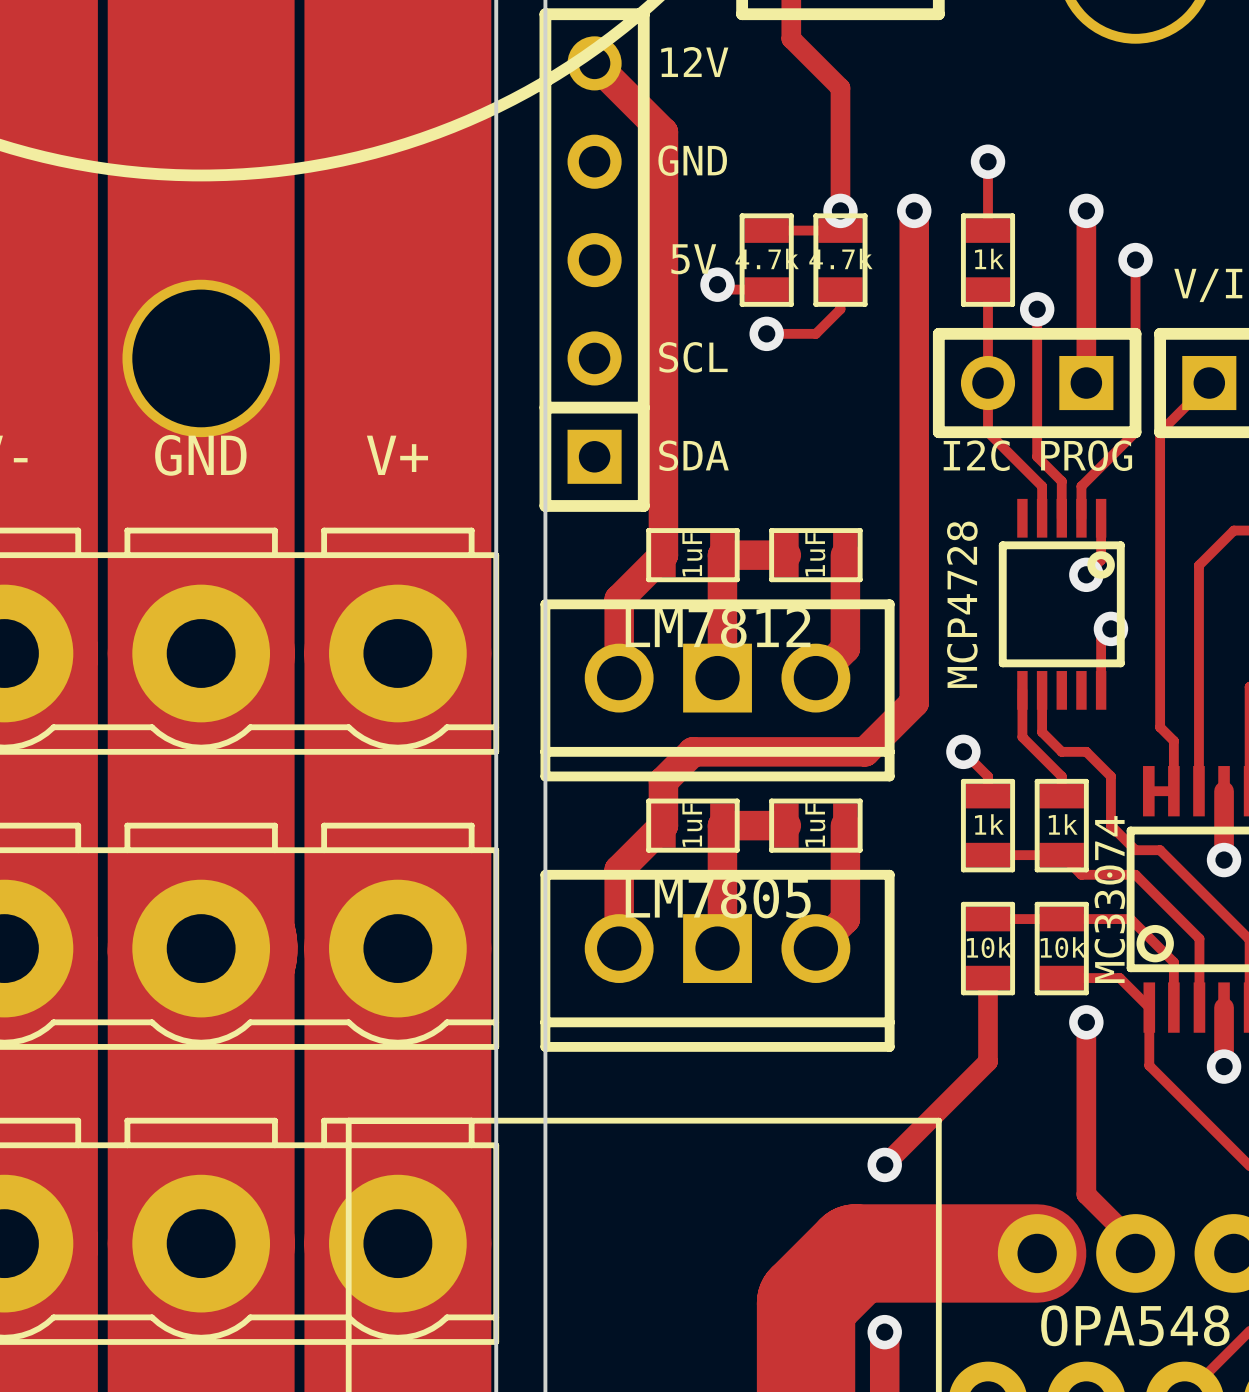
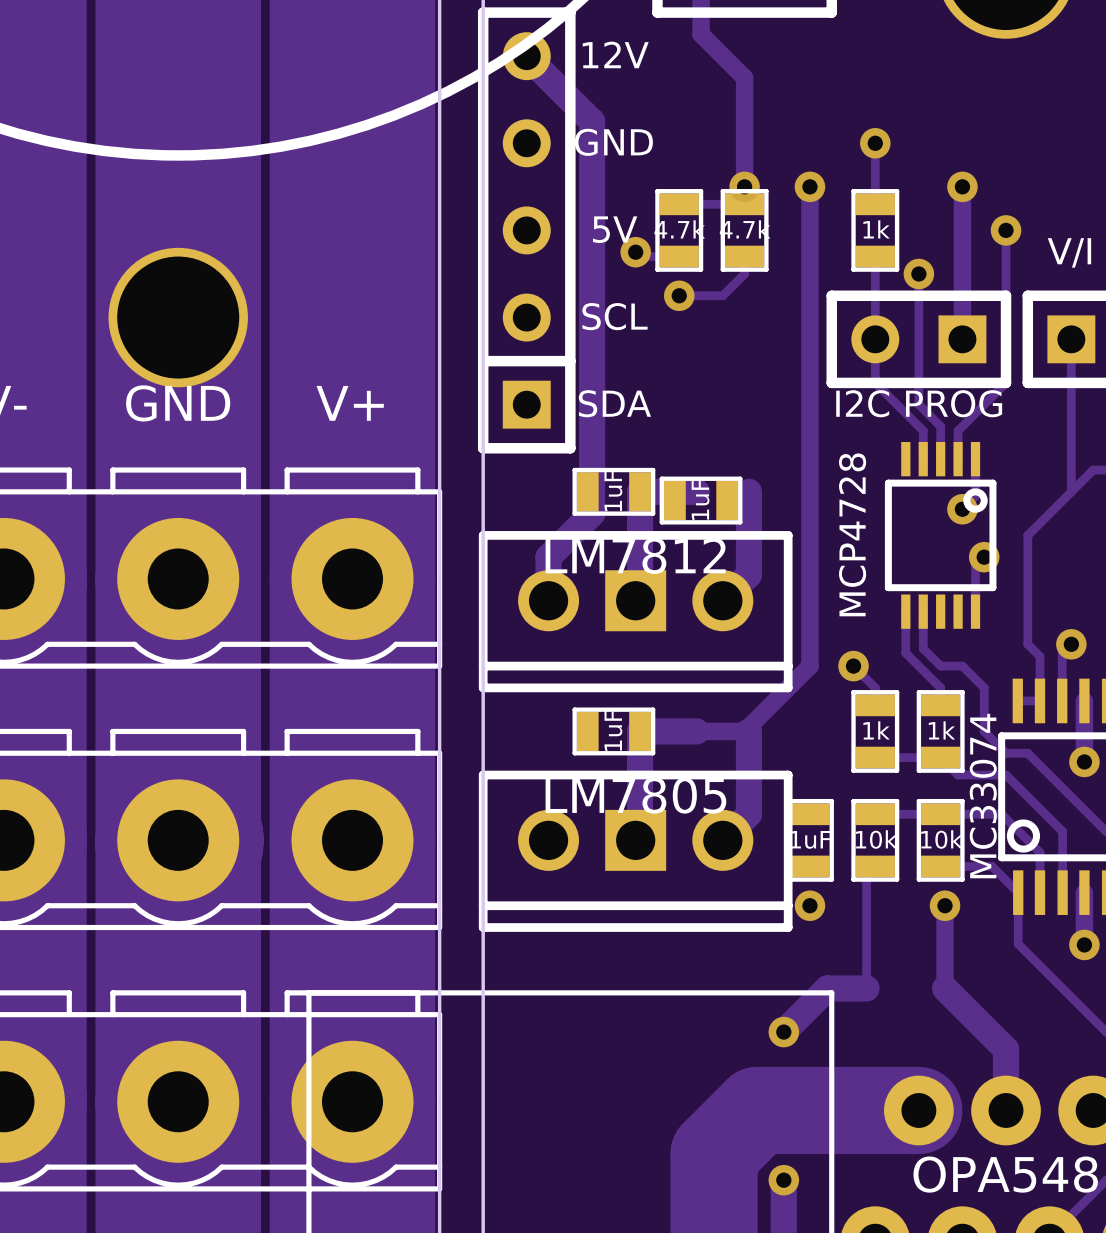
track: (663, 132) (663, 555) (619, 599) (619, 628) -> (587, 117) (592, 121) (592, 513) (548, 557)
track width: thick (914, 210) (914, 702) -> thin (809, 186) (809, 622)
track: (1209, 383) (1160, 432) (1160, 604) -> (1071, 339) (1071, 491)
part position: (815, 555) -> (701, 500)
track: (1198, 565) (1198, 737) -> (1062, 500) (1027, 535)
track: (914, 702) (865, 751) (692, 751) (663, 781) (663, 825) (619, 869) (619, 923) -> (809, 622) (809, 666) (744, 731) (696, 731)
via: none -> (1071, 644)
part rotation: 0° (815, 825) -> 90° clockwise (809, 840)
part position: (815, 825) -> (809, 840)
track: (988, 978) (988, 1061) (933, 1115) -> (875, 866) (866, 875) (866, 988) (827, 988)
via: none -> (809, 905)
track: (1086, 1022) (1086, 1194) (1135, 1243) -> (945, 905) (945, 988) (1006, 1049) (1006, 1101)
via position: (1086, 1022) -> (945, 905)
track width: thin (933, 1115) (884, 1164) -> thick (827, 988) (783, 1032)

